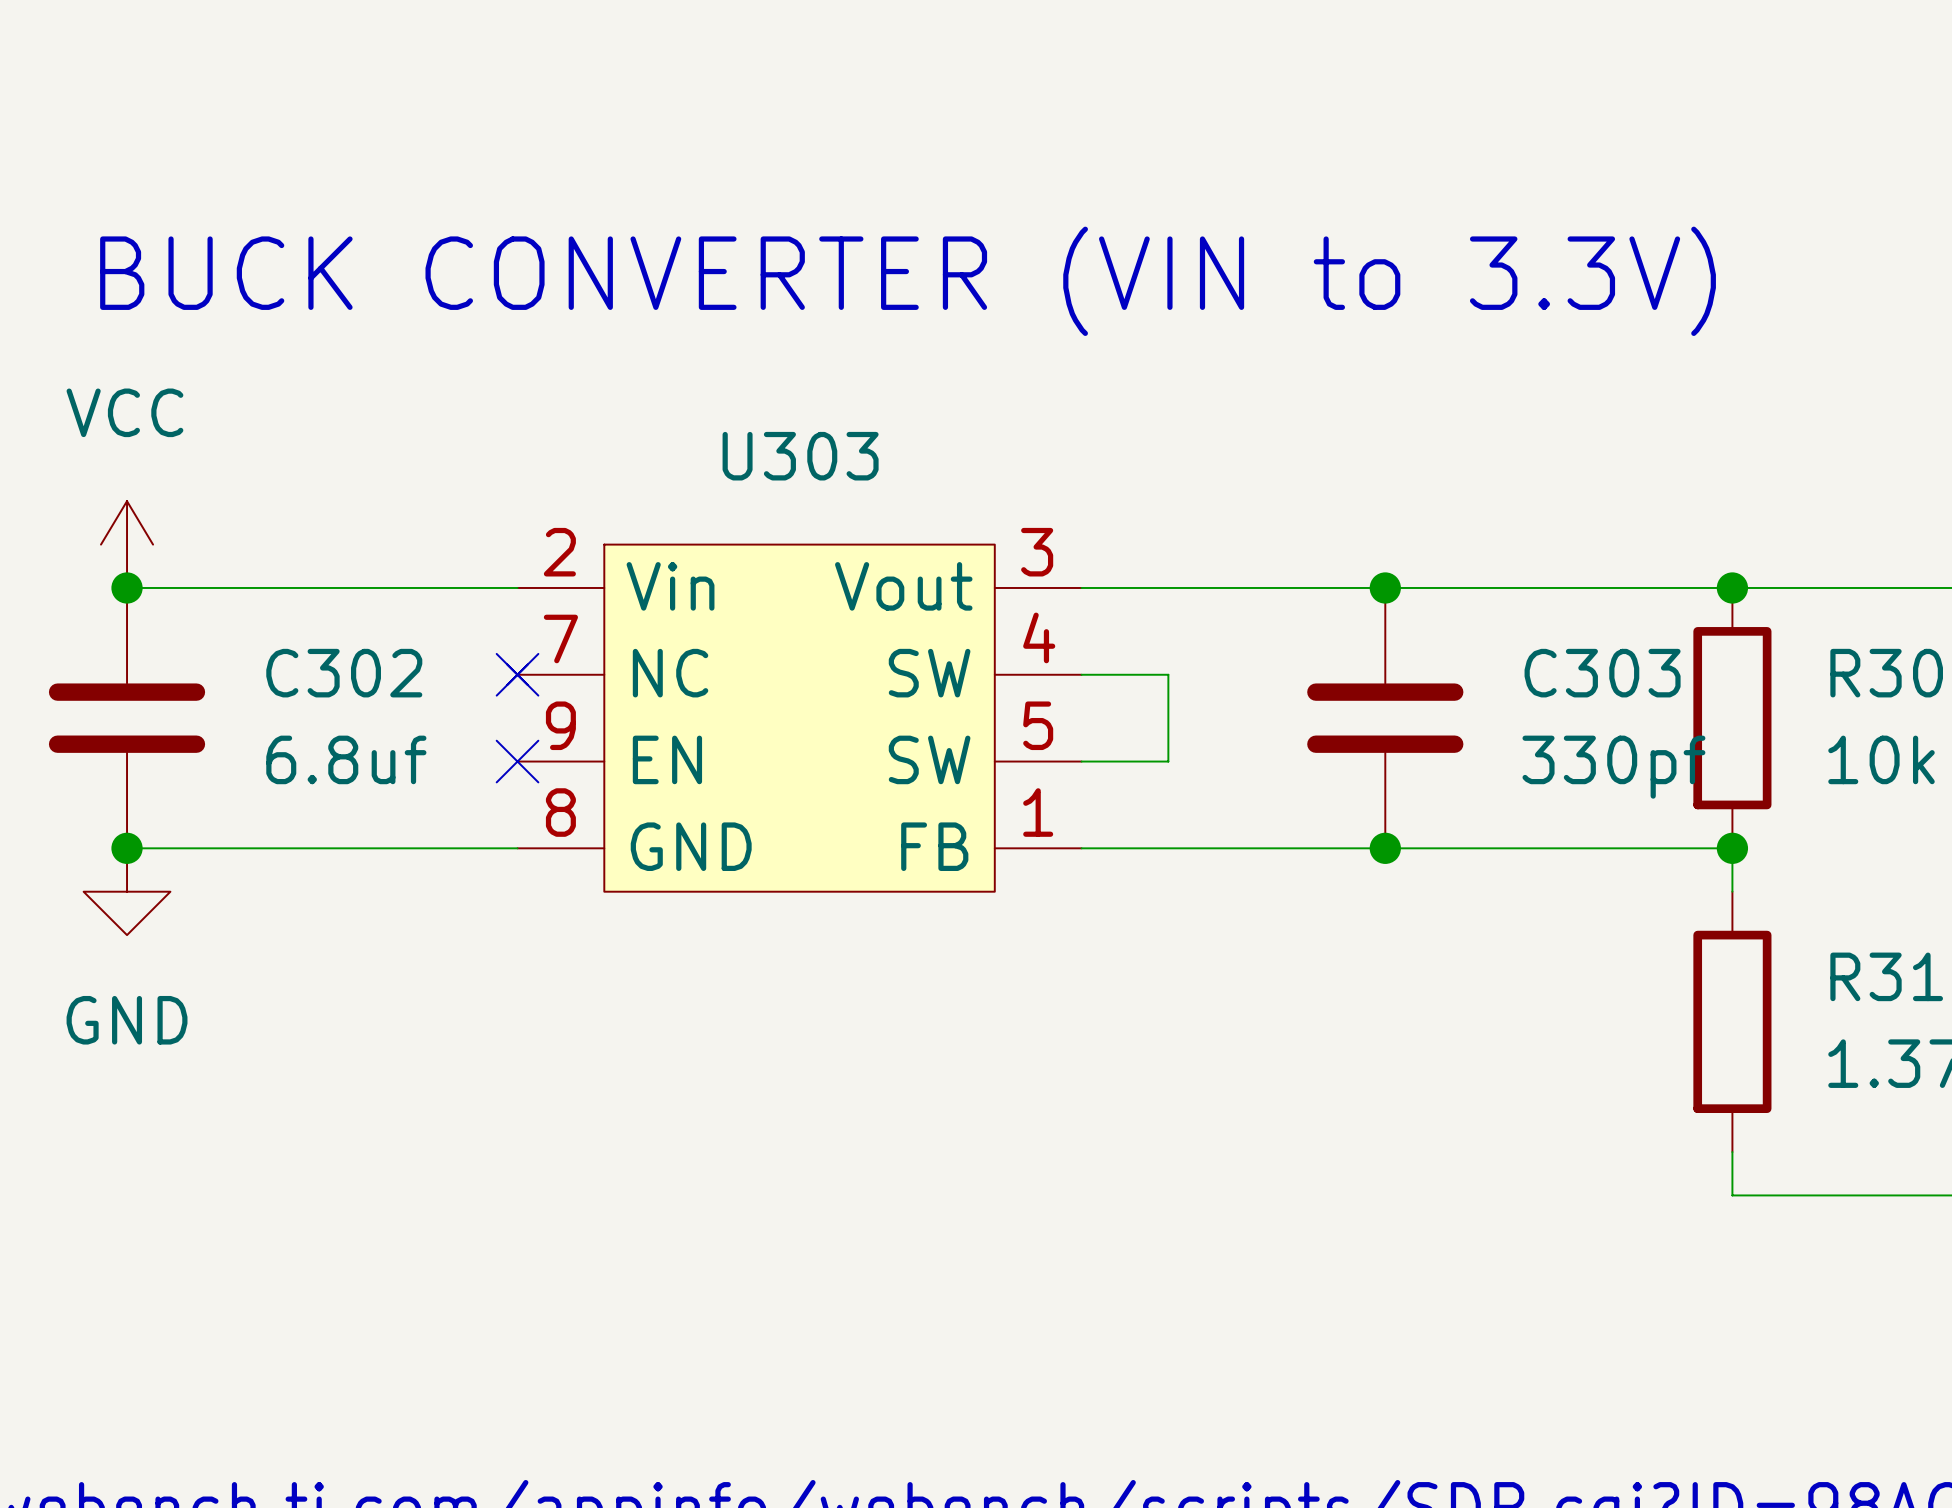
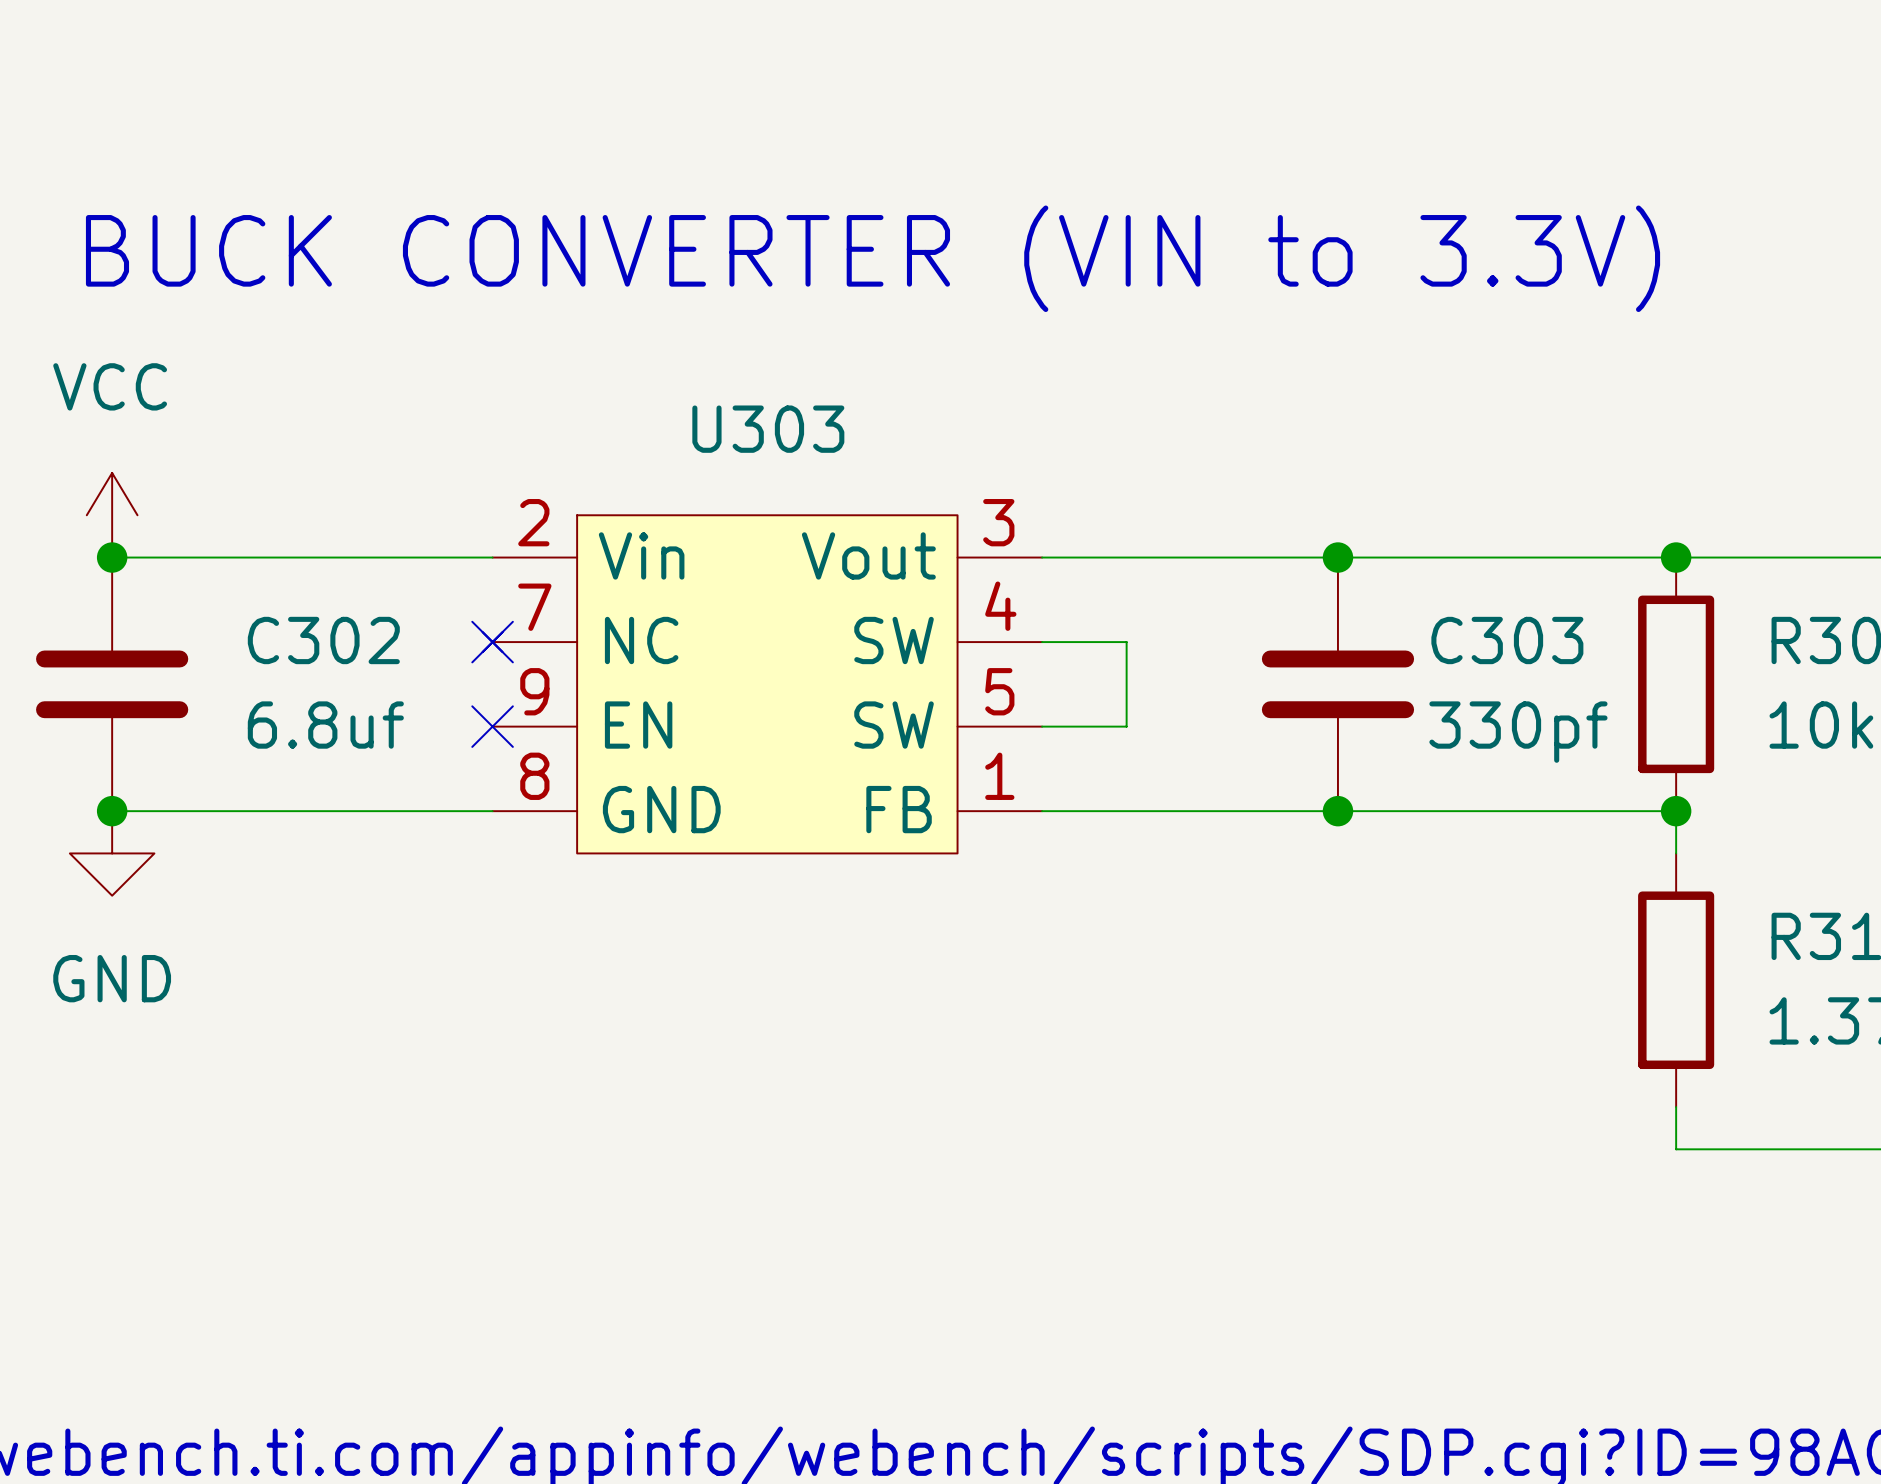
C303 name position: C303 (1602, 673) -> C303 (1507, 640)
C303 value position: 330pf (1613, 767) -> 330pf (1518, 732)

